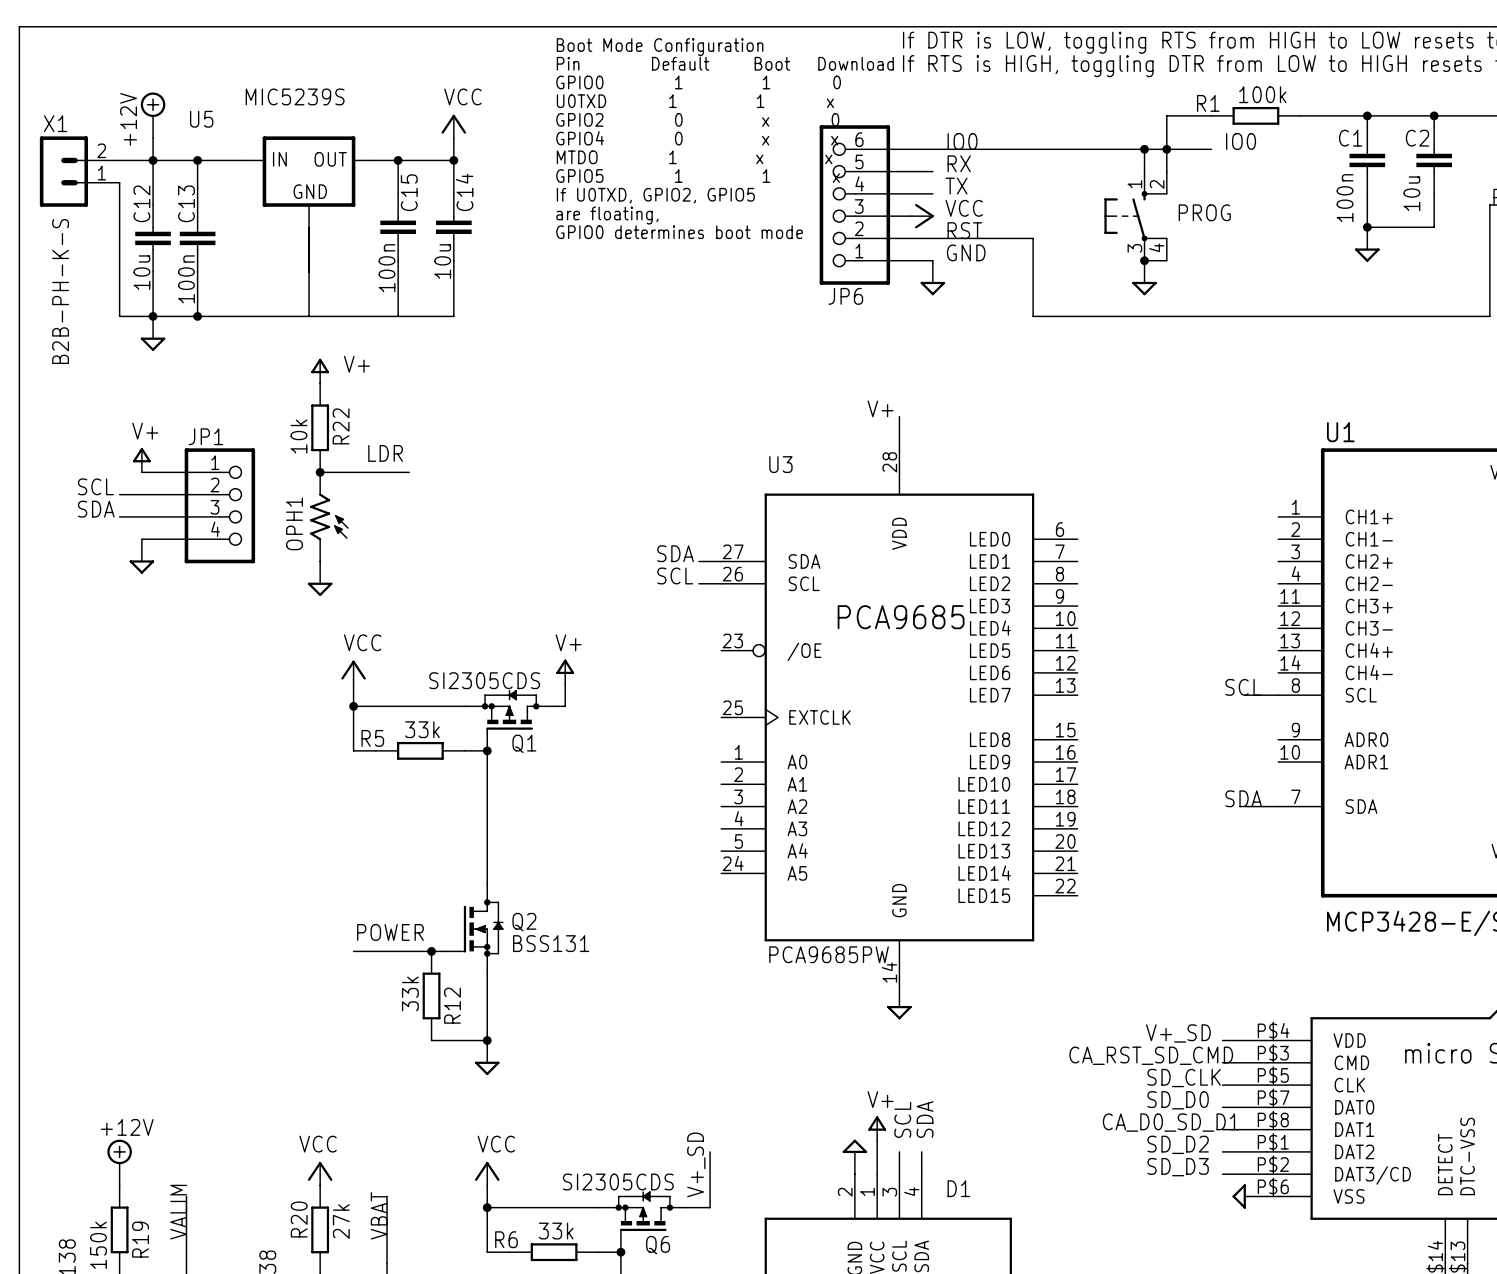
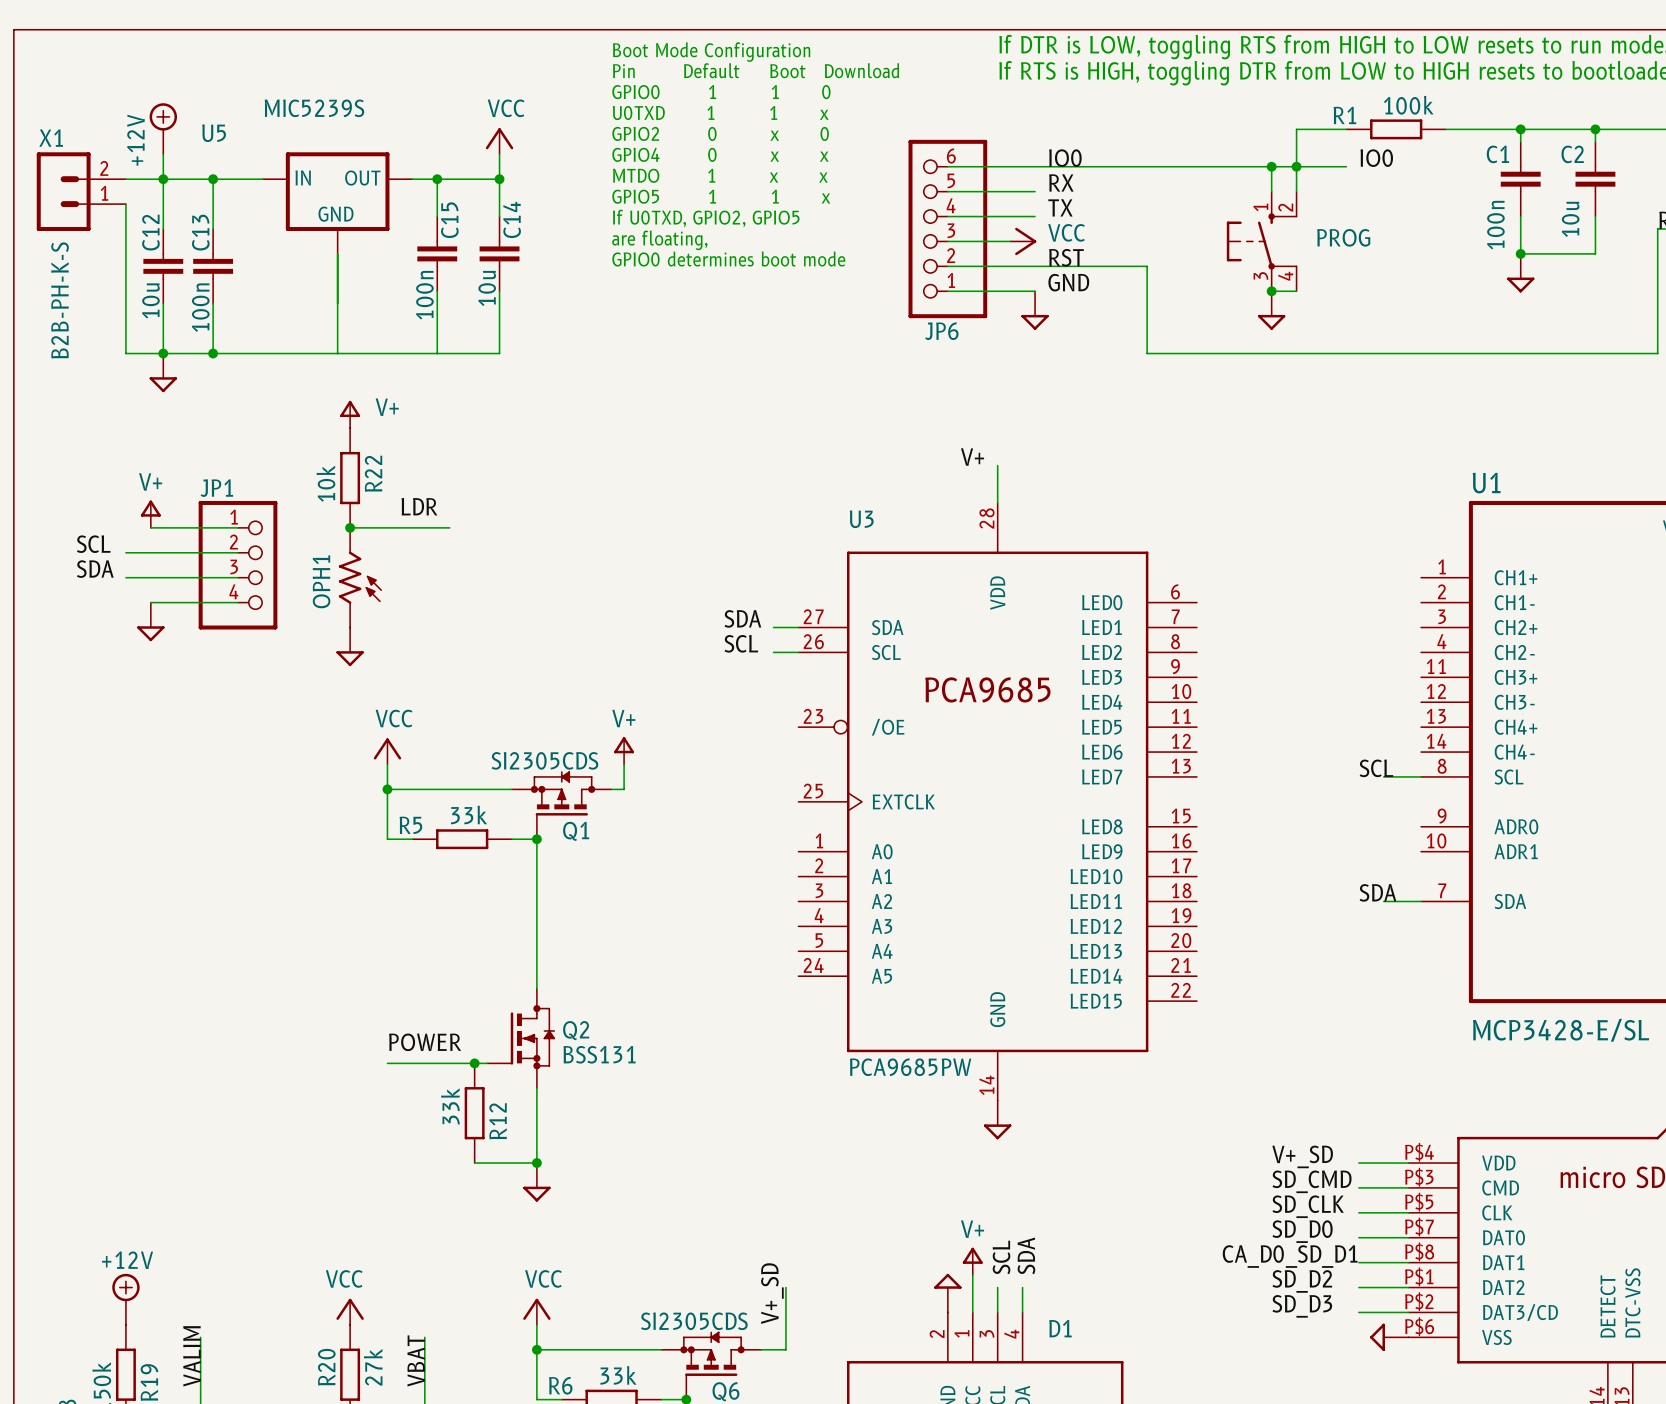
label: CA_RST_SD_CMD (1151, 1055) -> SD_CMD (1312, 1181)

